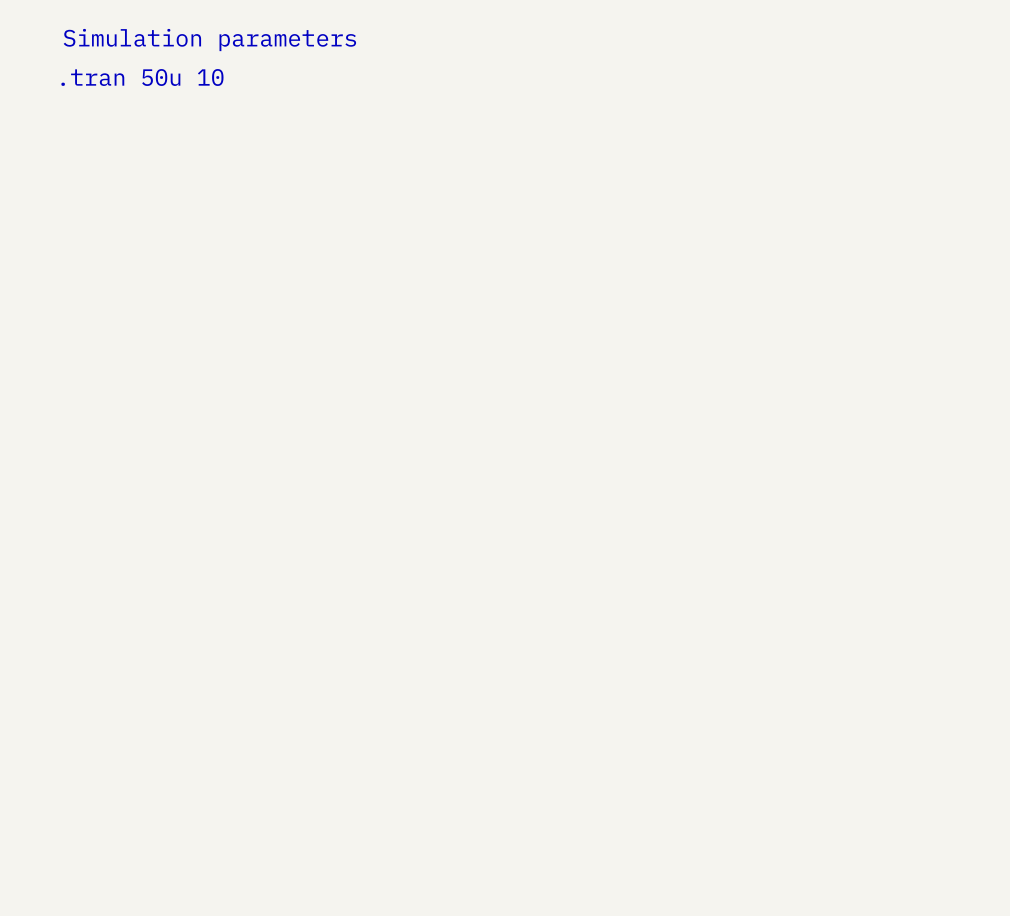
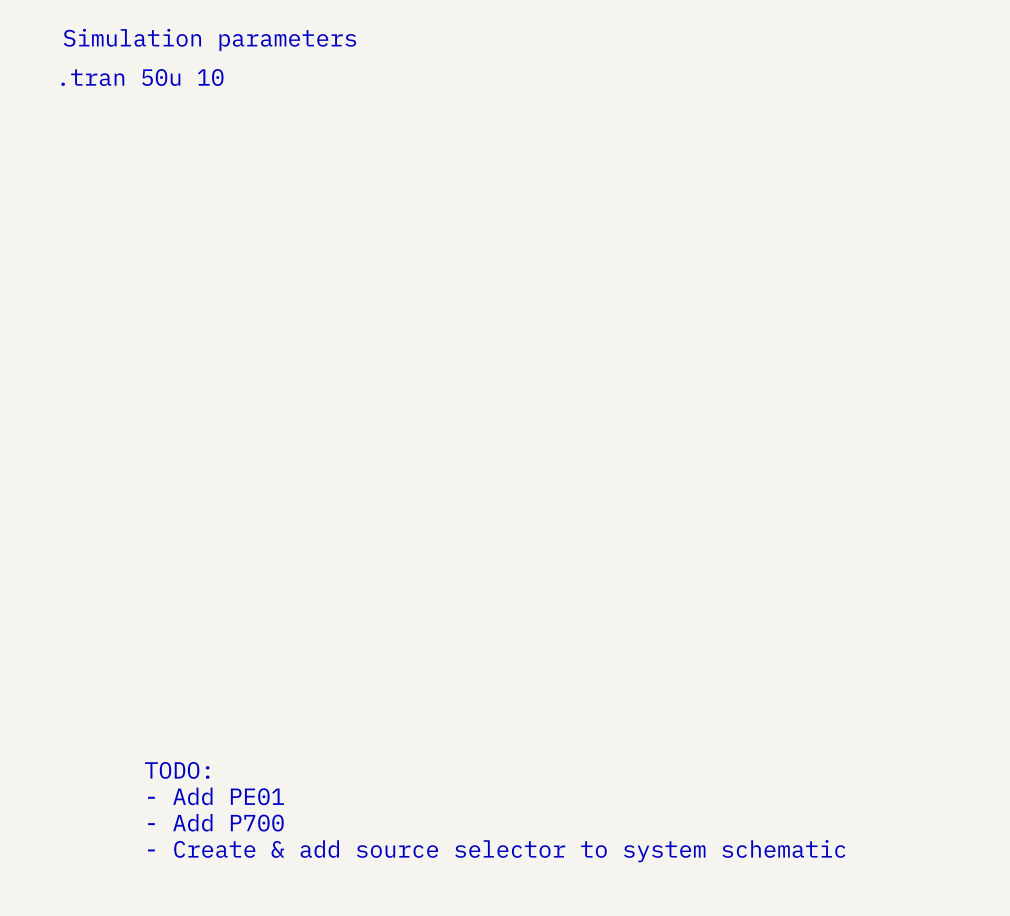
text: none -> TODO: (177, 770)
text: none -> - Add PE01 (215, 796)
text: none -> - Add P700 (215, 822)
text: none -> - Create & add source selector to system schematic (496, 851)

